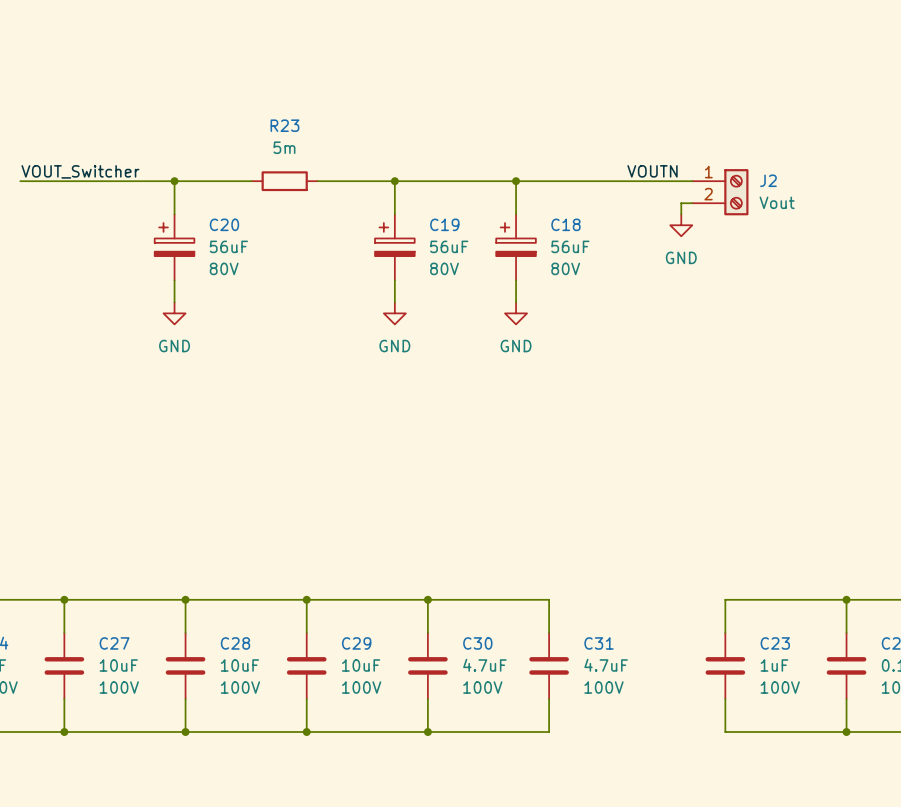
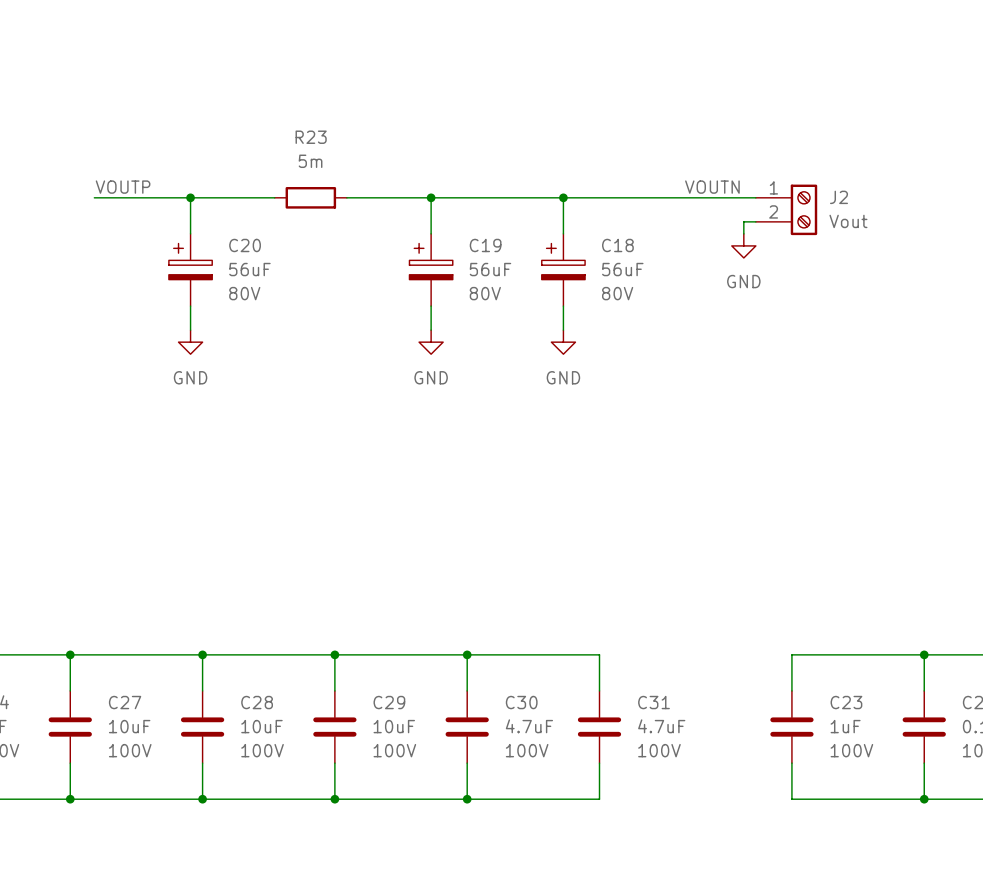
label: VOUT_Switcher (80, 171) -> none
label: none -> VOUTP (123, 187)
wire: (20, 181) (86, 181) -> none

